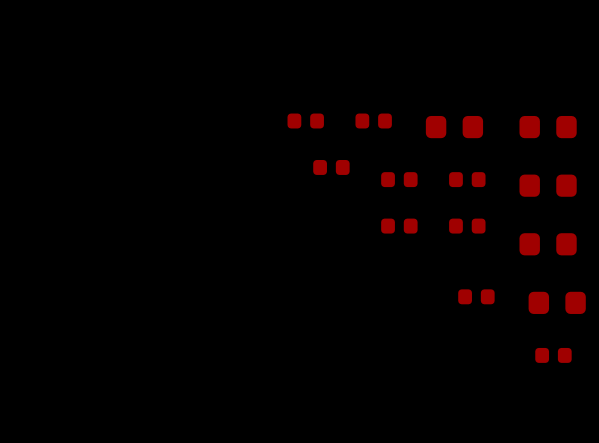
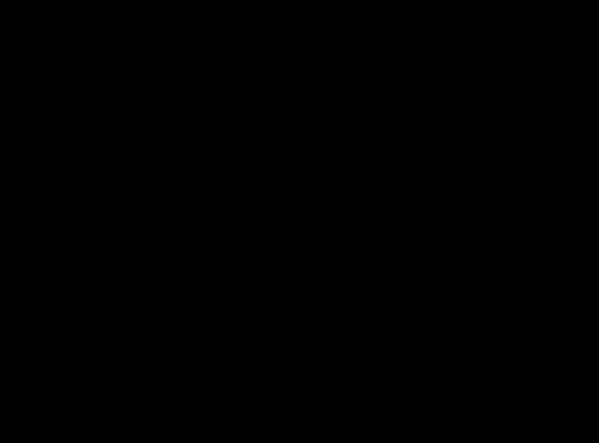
part: (305, 121) -> none
part: (373, 121) -> none
part: (454, 127) -> none
part: (548, 127) -> none
part: (331, 167) -> none
part: (399, 179) -> none
part: (467, 179) -> none
part: (548, 185) -> none
part: (399, 226) -> none
part: (467, 226) -> none
part: (548, 244) -> none
part: (476, 296) -> none
part: (557, 302) -> none
part: (553, 355) -> none

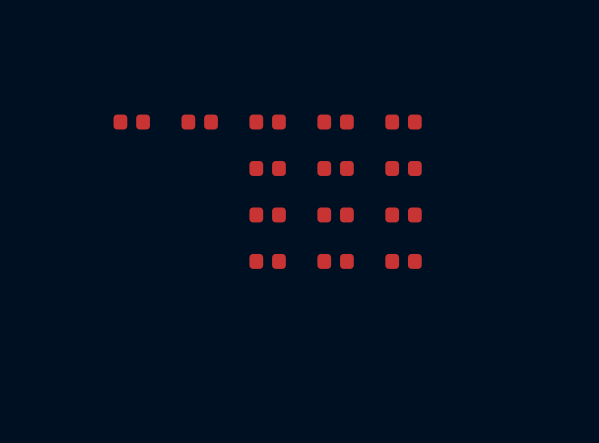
part: none -> (131, 122)
part: none -> (199, 122)
part: none -> (267, 122)
part: none -> (335, 122)
part: none -> (403, 122)
part: none -> (267, 168)
part: none -> (335, 168)
part: none -> (403, 168)
part: none -> (267, 214)
part: none -> (335, 214)
part: none -> (403, 214)
part: none -> (267, 261)
part: none -> (335, 261)
part: none -> (403, 261)

